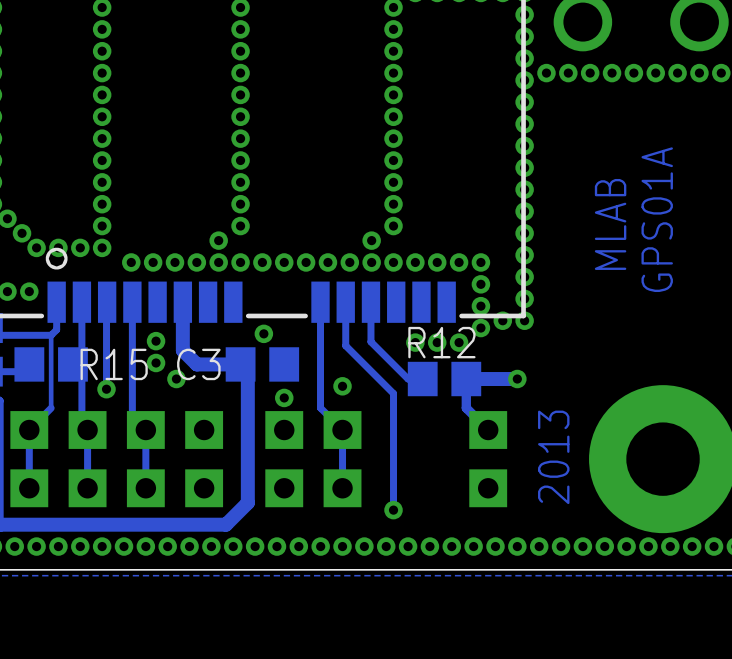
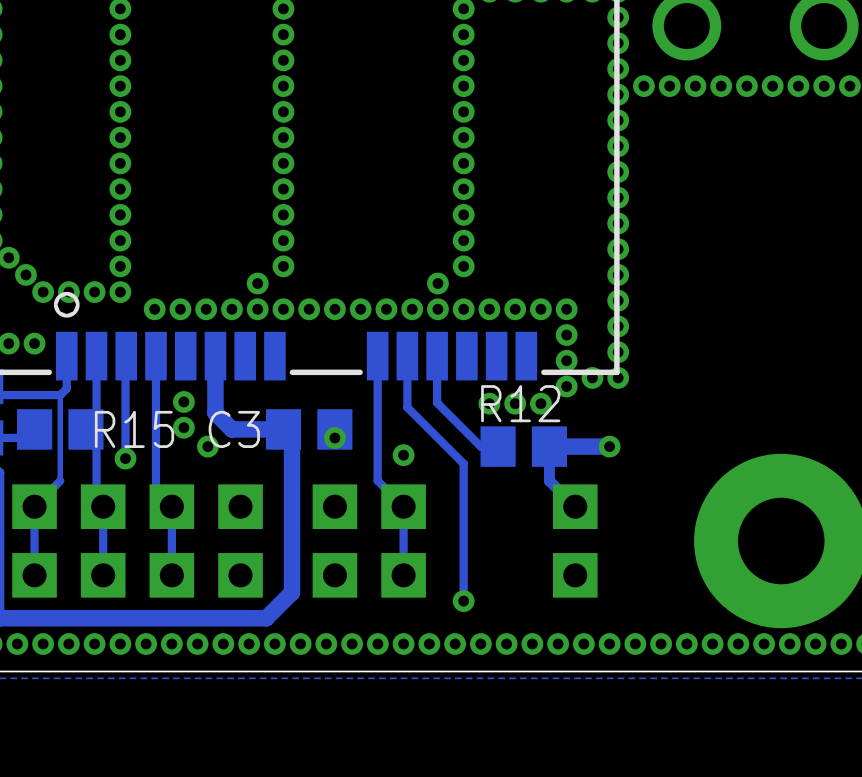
text: GPS01A (657, 219) -> none
text: MLAB (610, 224) -> none
via: (263, 333) -> none
via: none -> (334, 438)
via: (284, 397) -> none
text: 2013 (553, 457) -> none

